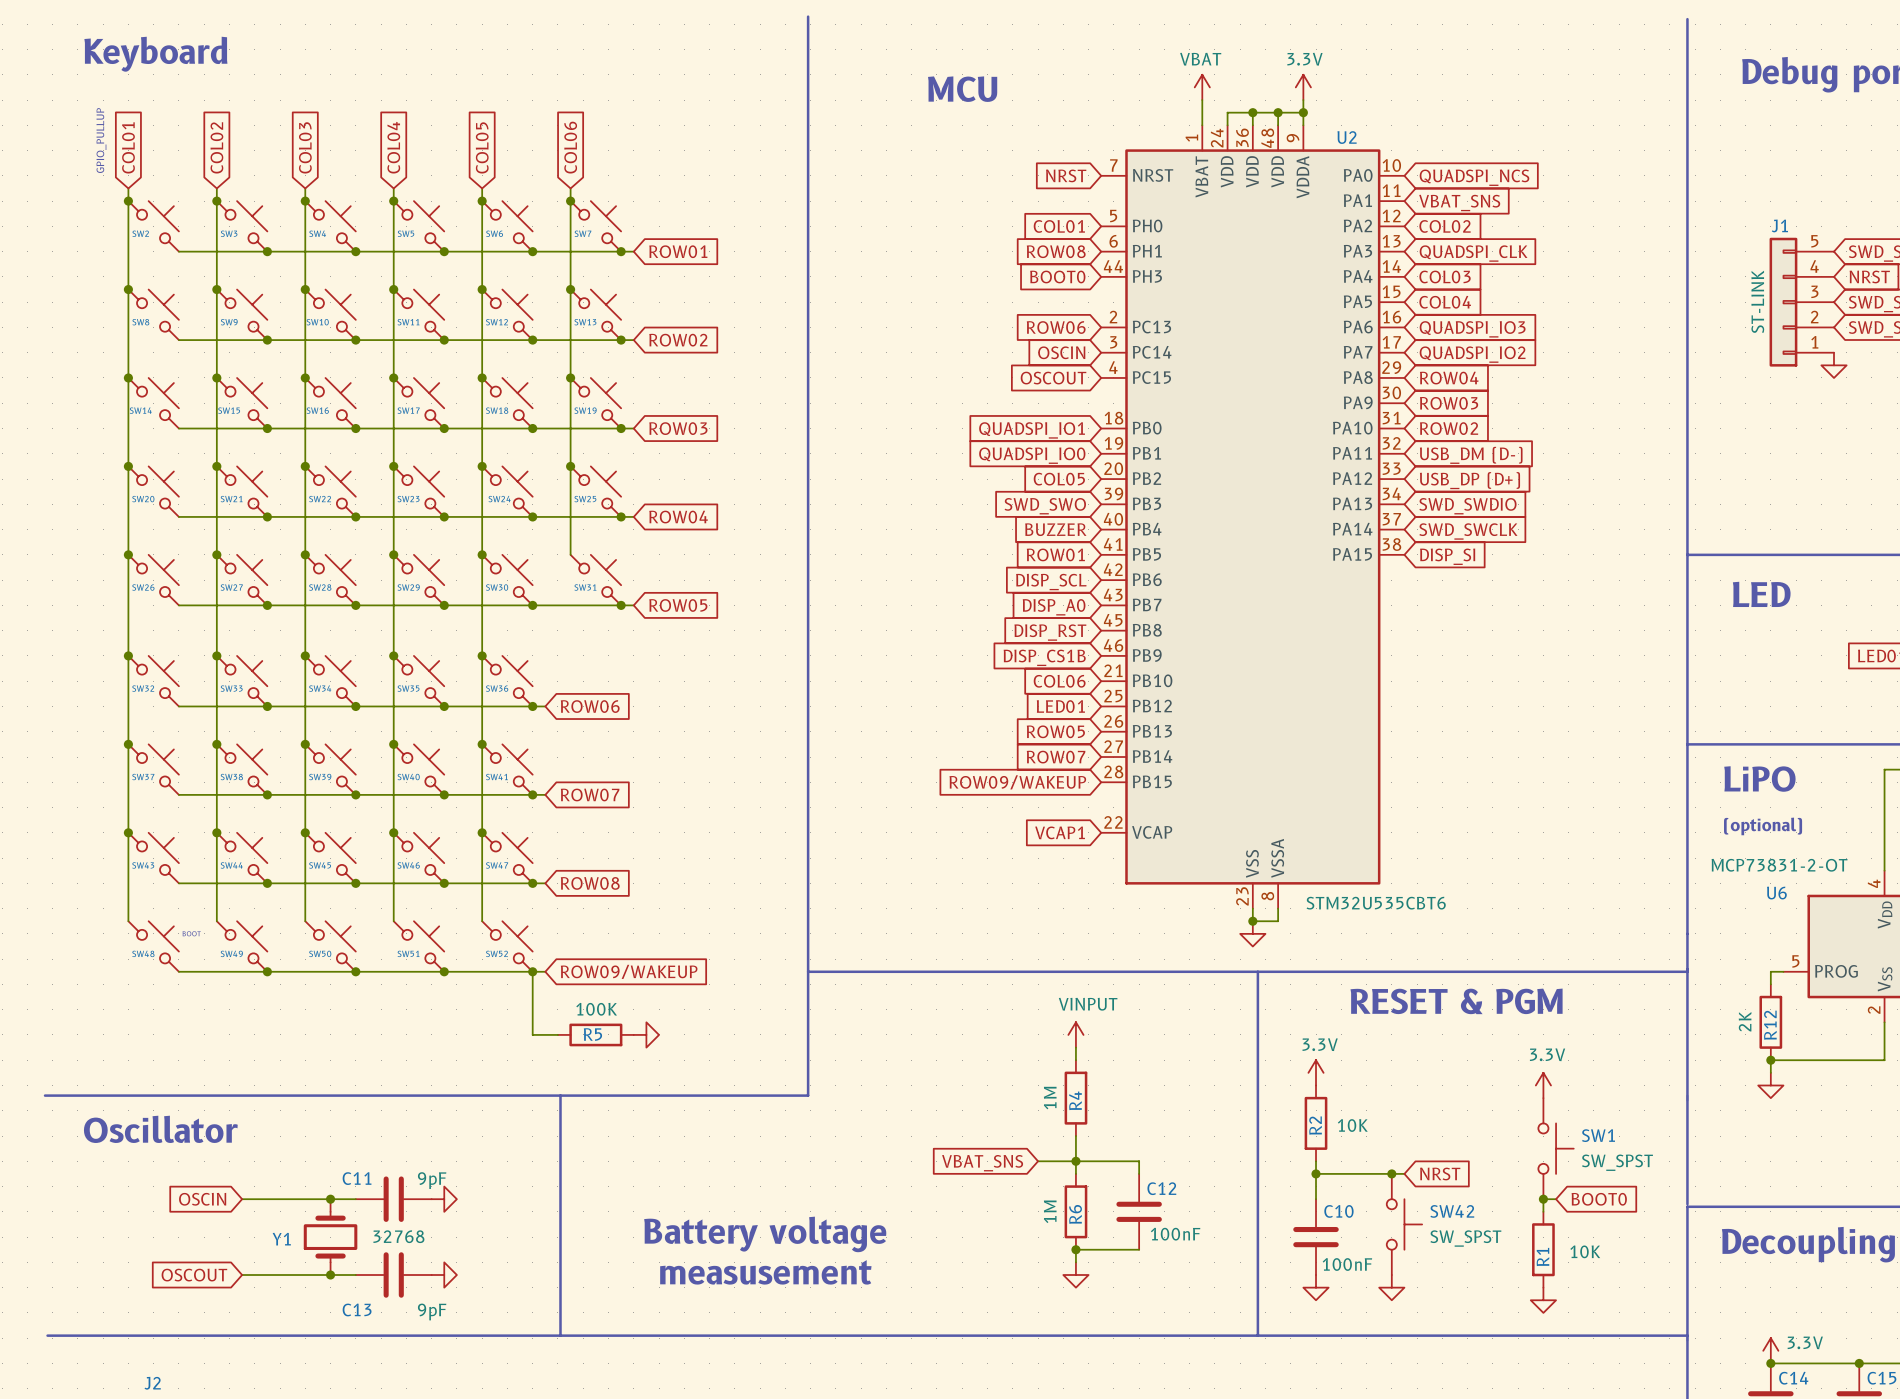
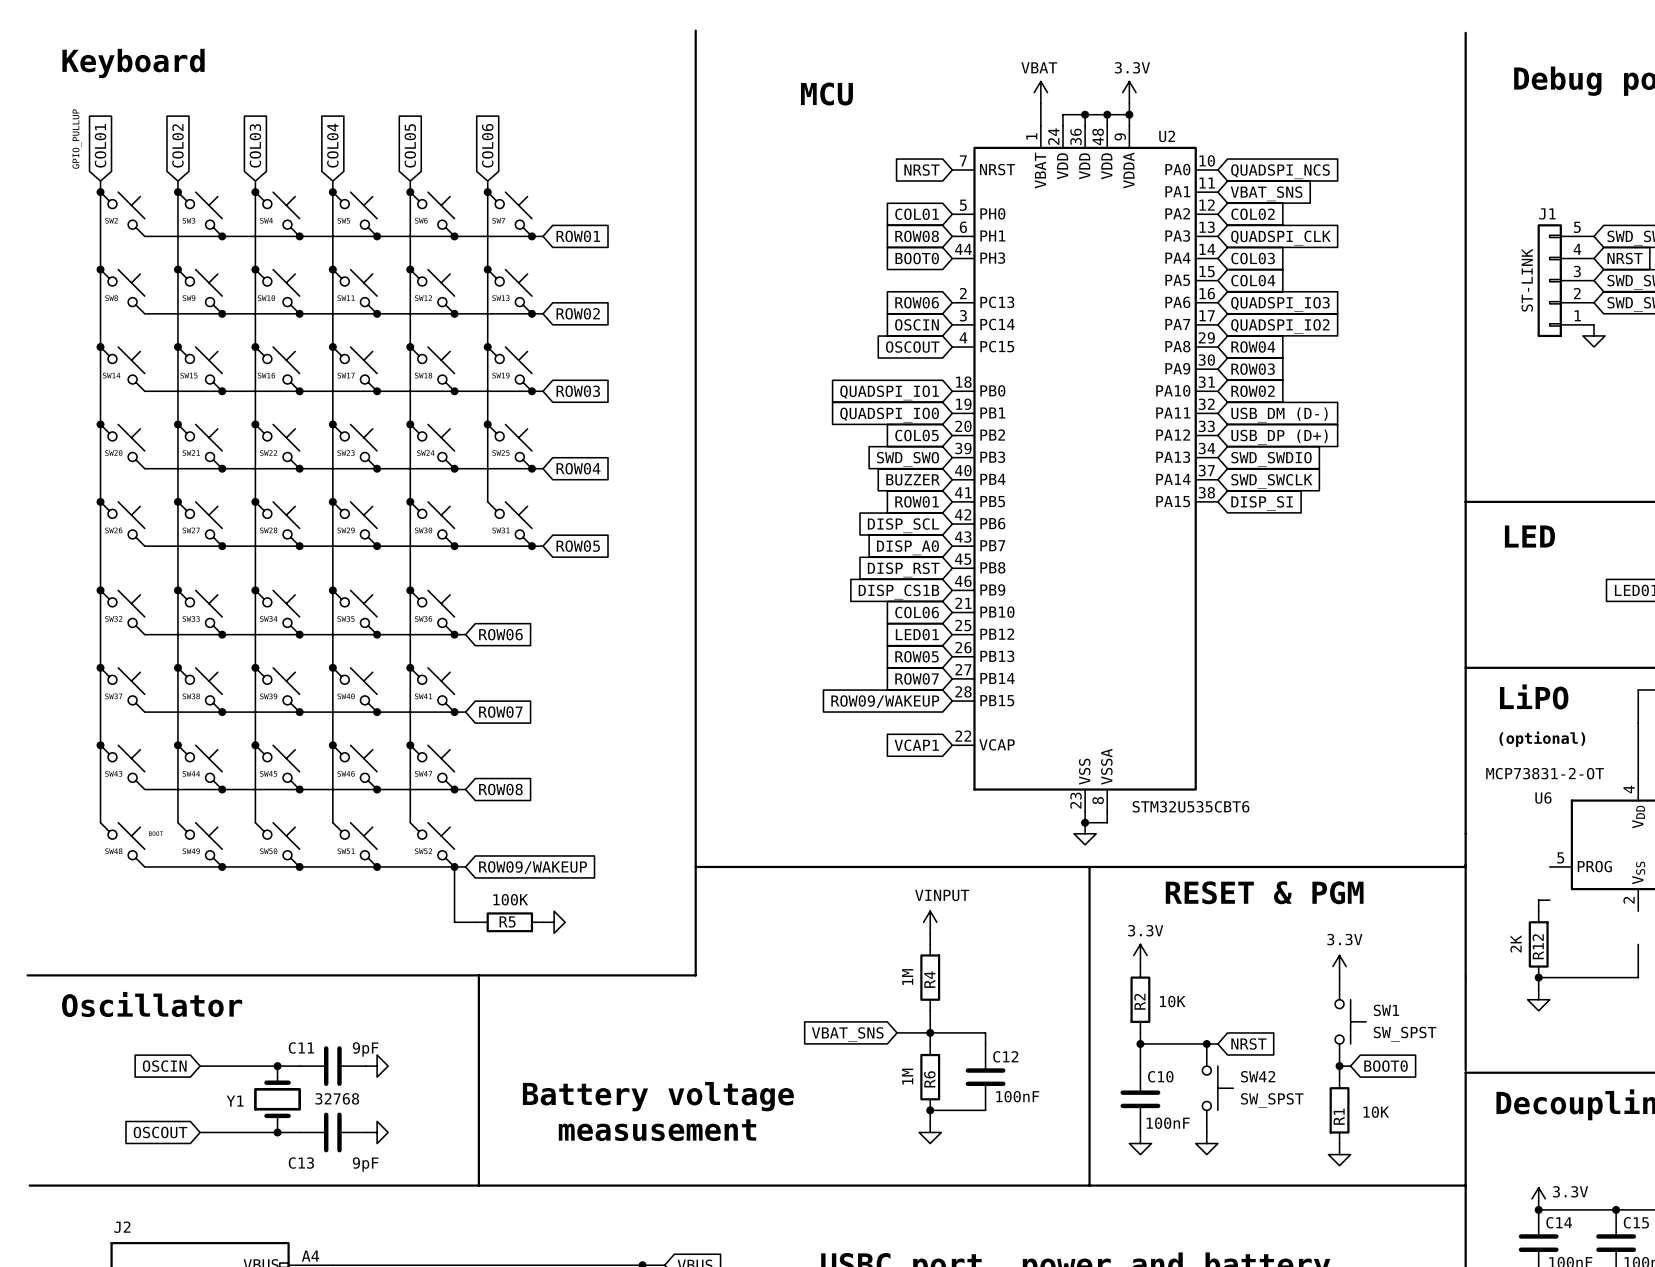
wire: (1783, 971) (1770, 971) (1770, 984) -> (1549, 900) (1538, 900) (1538, 911)
R12 position: (1770, 1022) -> (1538, 944)
wire: (1884, 1022) (1884, 1060) (1770, 1060) (1770, 1072) -> (1638, 944) (1638, 977) (1538, 977) (1538, 988)
junction position: (1770, 1060) -> (1538, 977)
power symbol position: (1770, 1085) -> (1538, 999)

